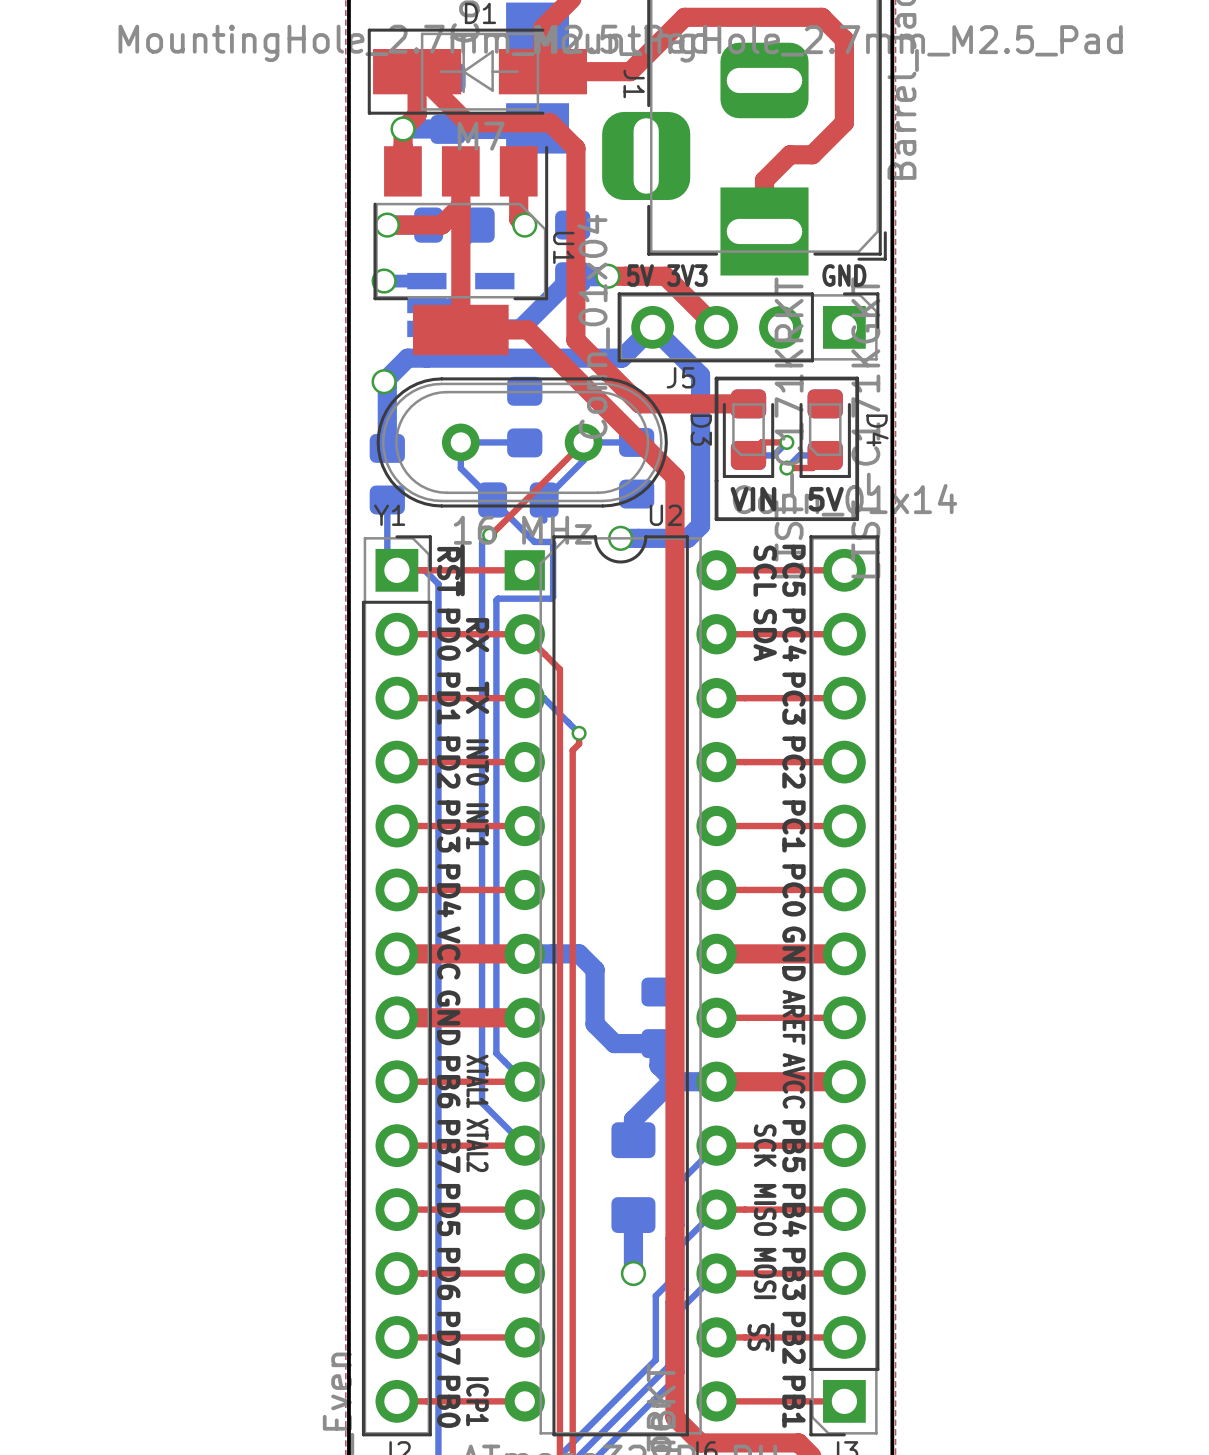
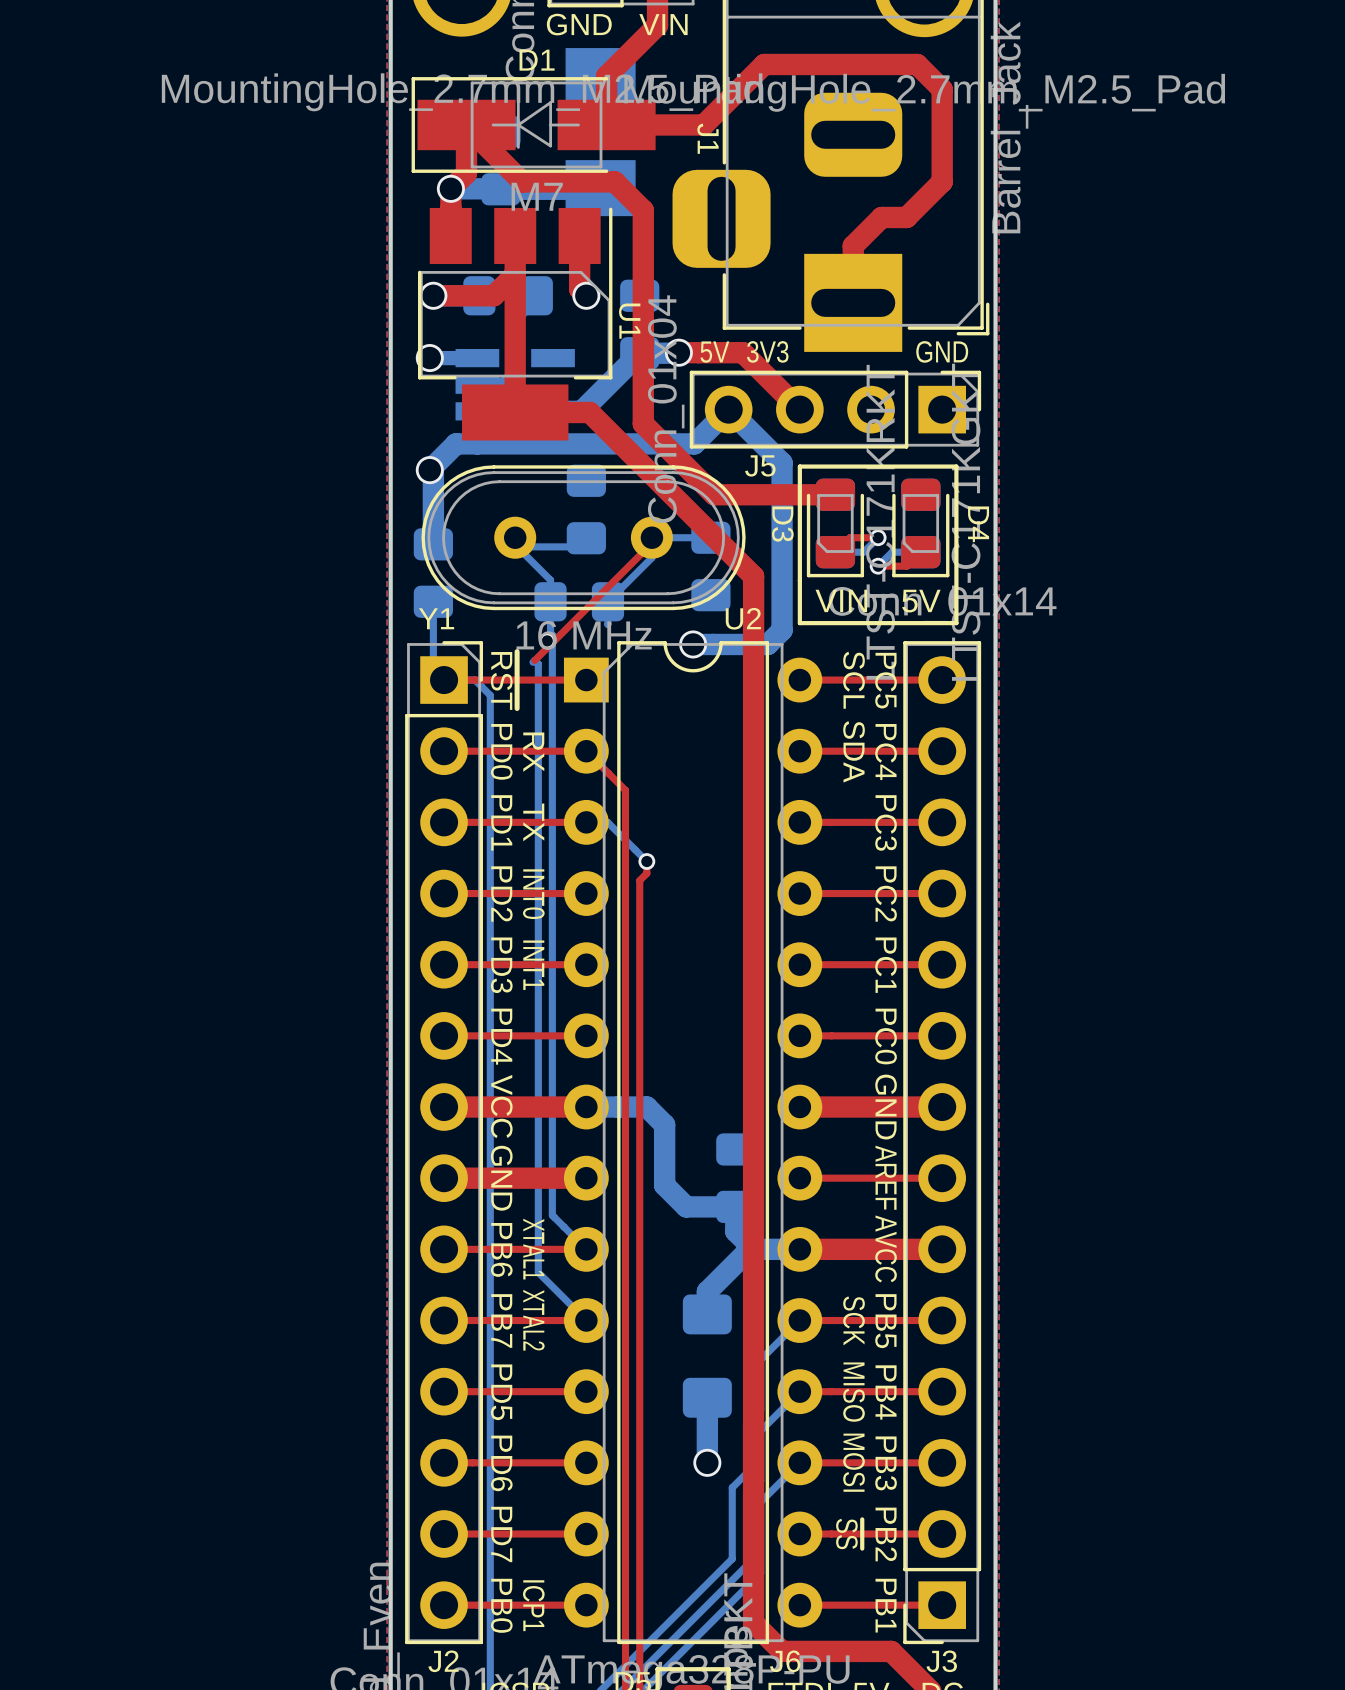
bottom track: (524, 442) (460, 442) (460, 468) (534, 541) (553, 543) (553, 597) (551, 598) (498, 598) (496, 600) (496, 1053) -> (515, 544) (550, 580) (550, 633) (552, 634) (552, 1215) (554, 1217)
top track: (583, 442) (489, 535) -> none
top track: none -> (651, 544) (534, 660)
bottom track: none -> (517, 546) (584, 546)
bottom track: (489, 535) (482, 542) (482, 1102) -> (533, 662) (534, 660) (538, 664) (538, 1272)

